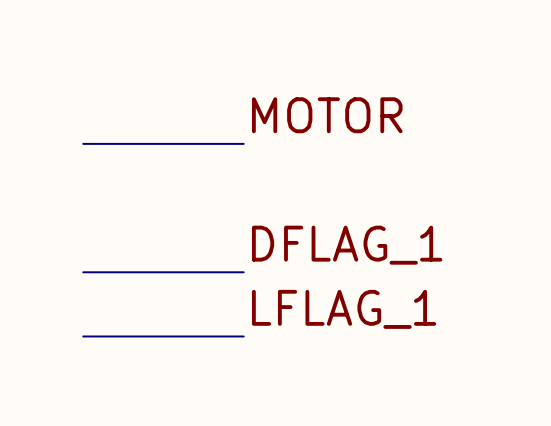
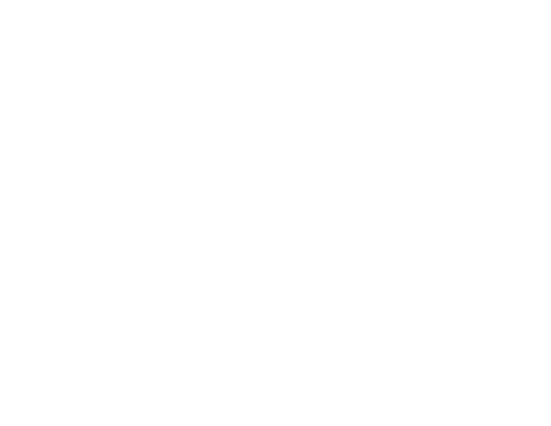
label: MOTOR (327, 115) -> none
wire: (83, 143) (243, 143) -> none
label: DFLAG_1 (347, 245) -> none
wire: (83, 272) (243, 272) -> none
label: LFLAG_1 (344, 309) -> none
wire: (83, 336) (243, 336) -> none

